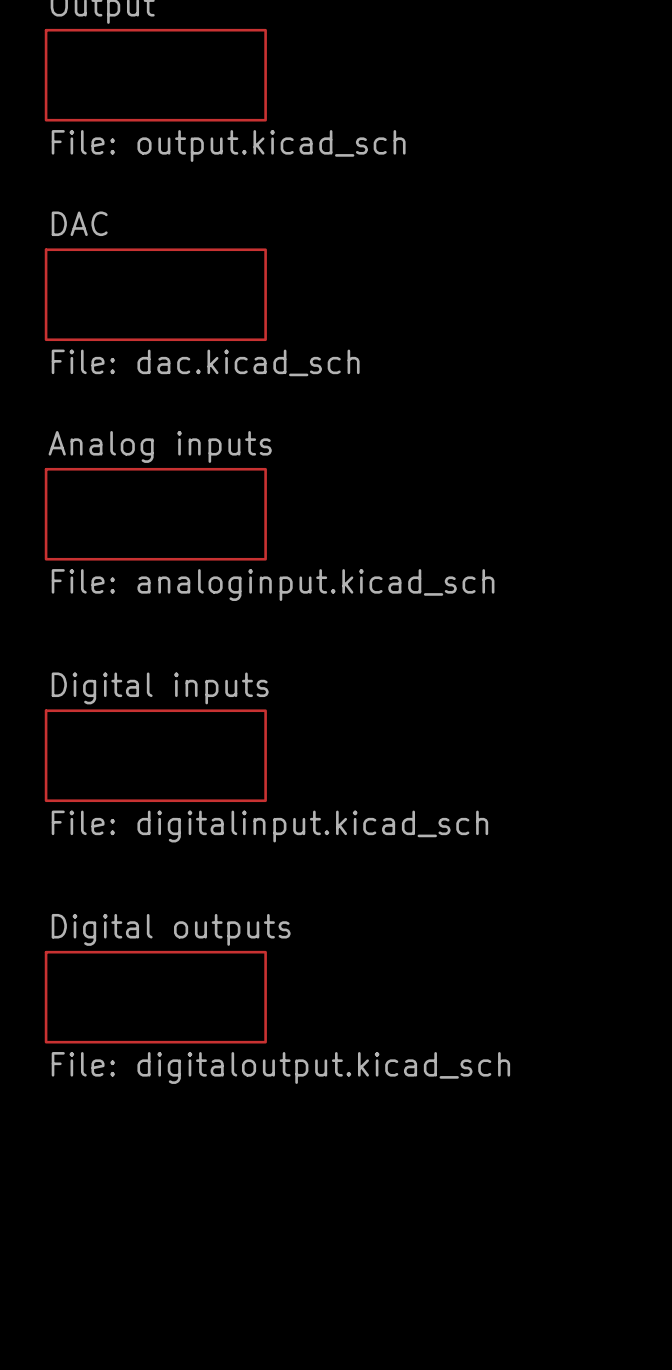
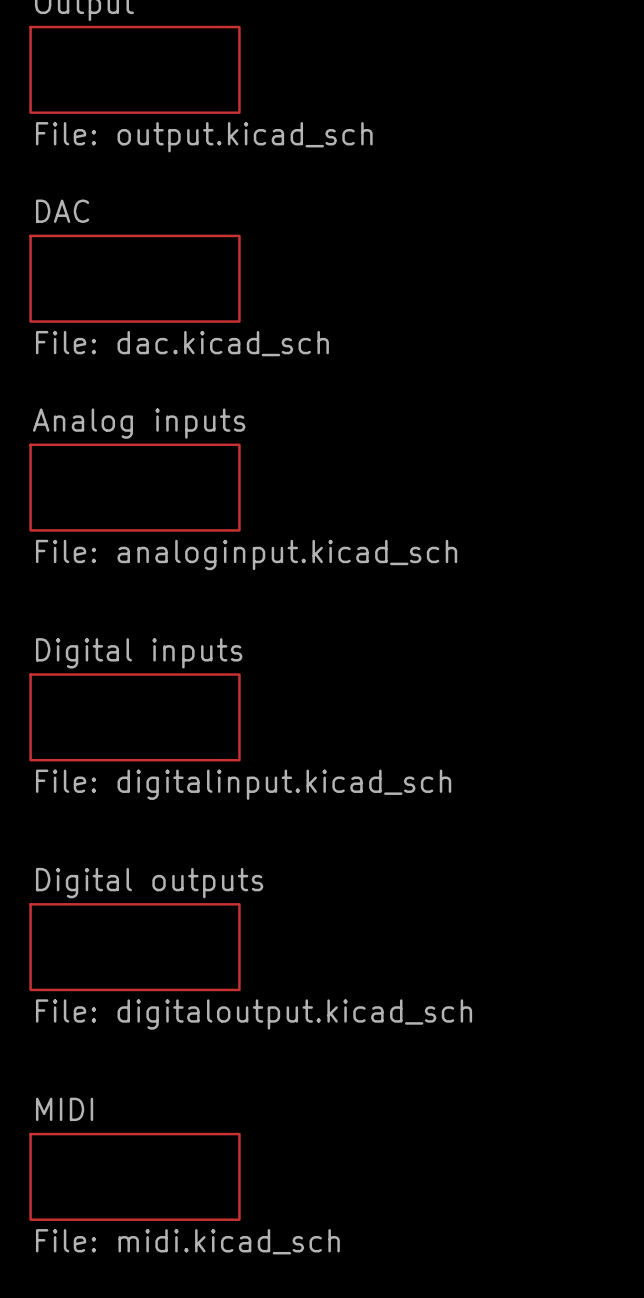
sheet MIDI: none -> File: midi.kicad_sch (135, 1176)

